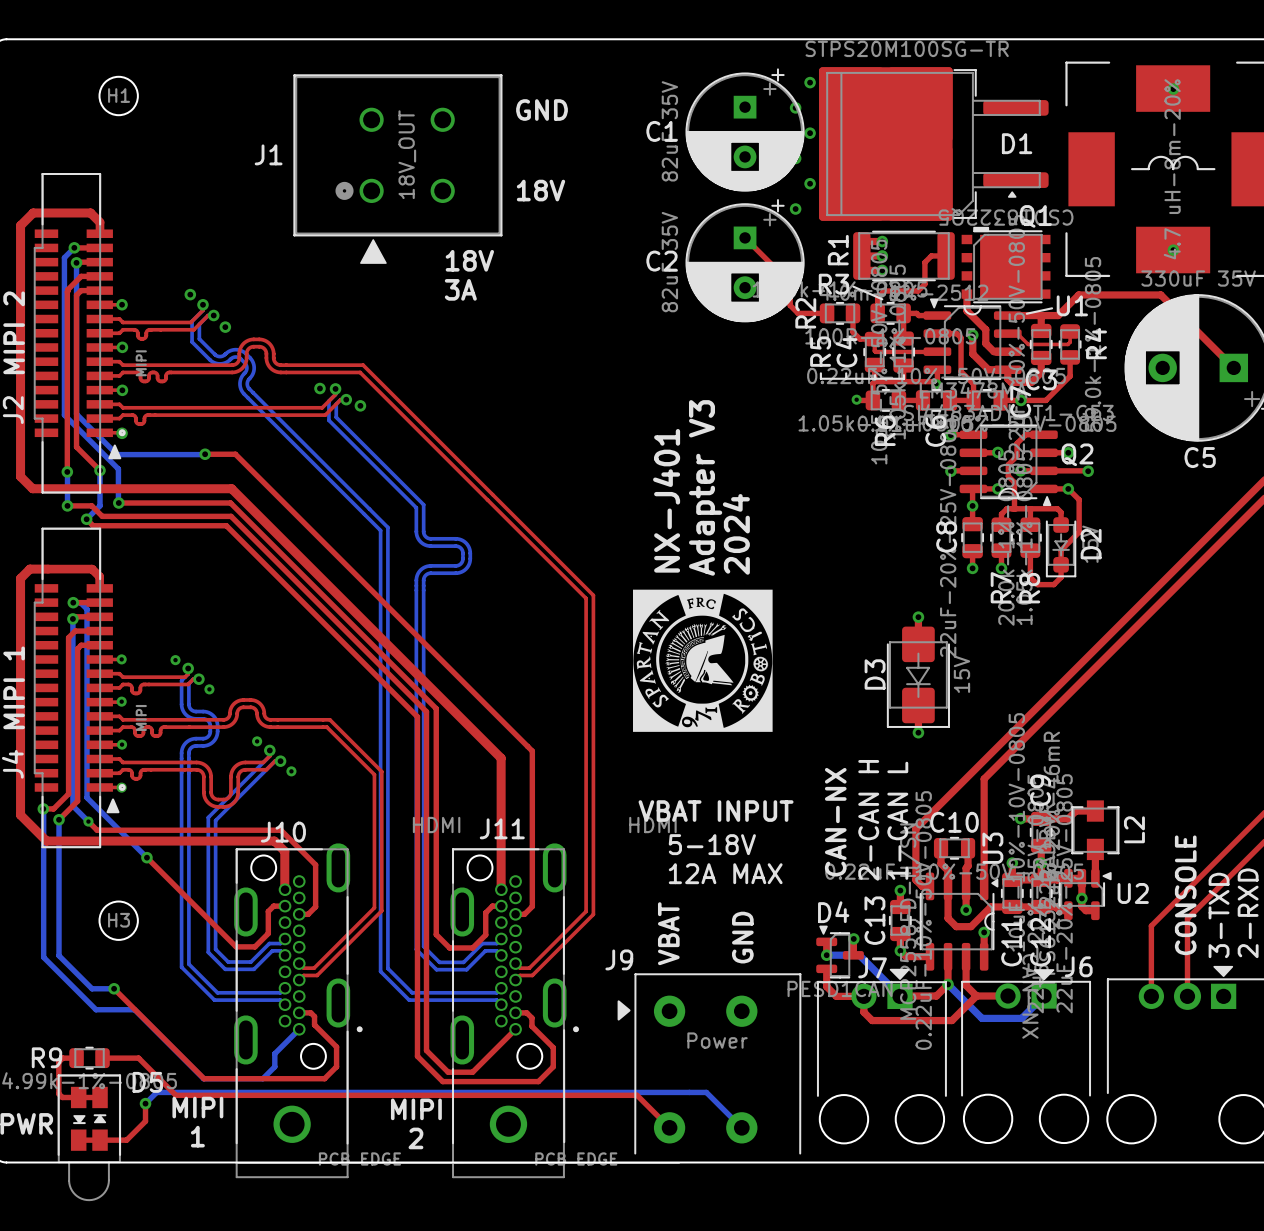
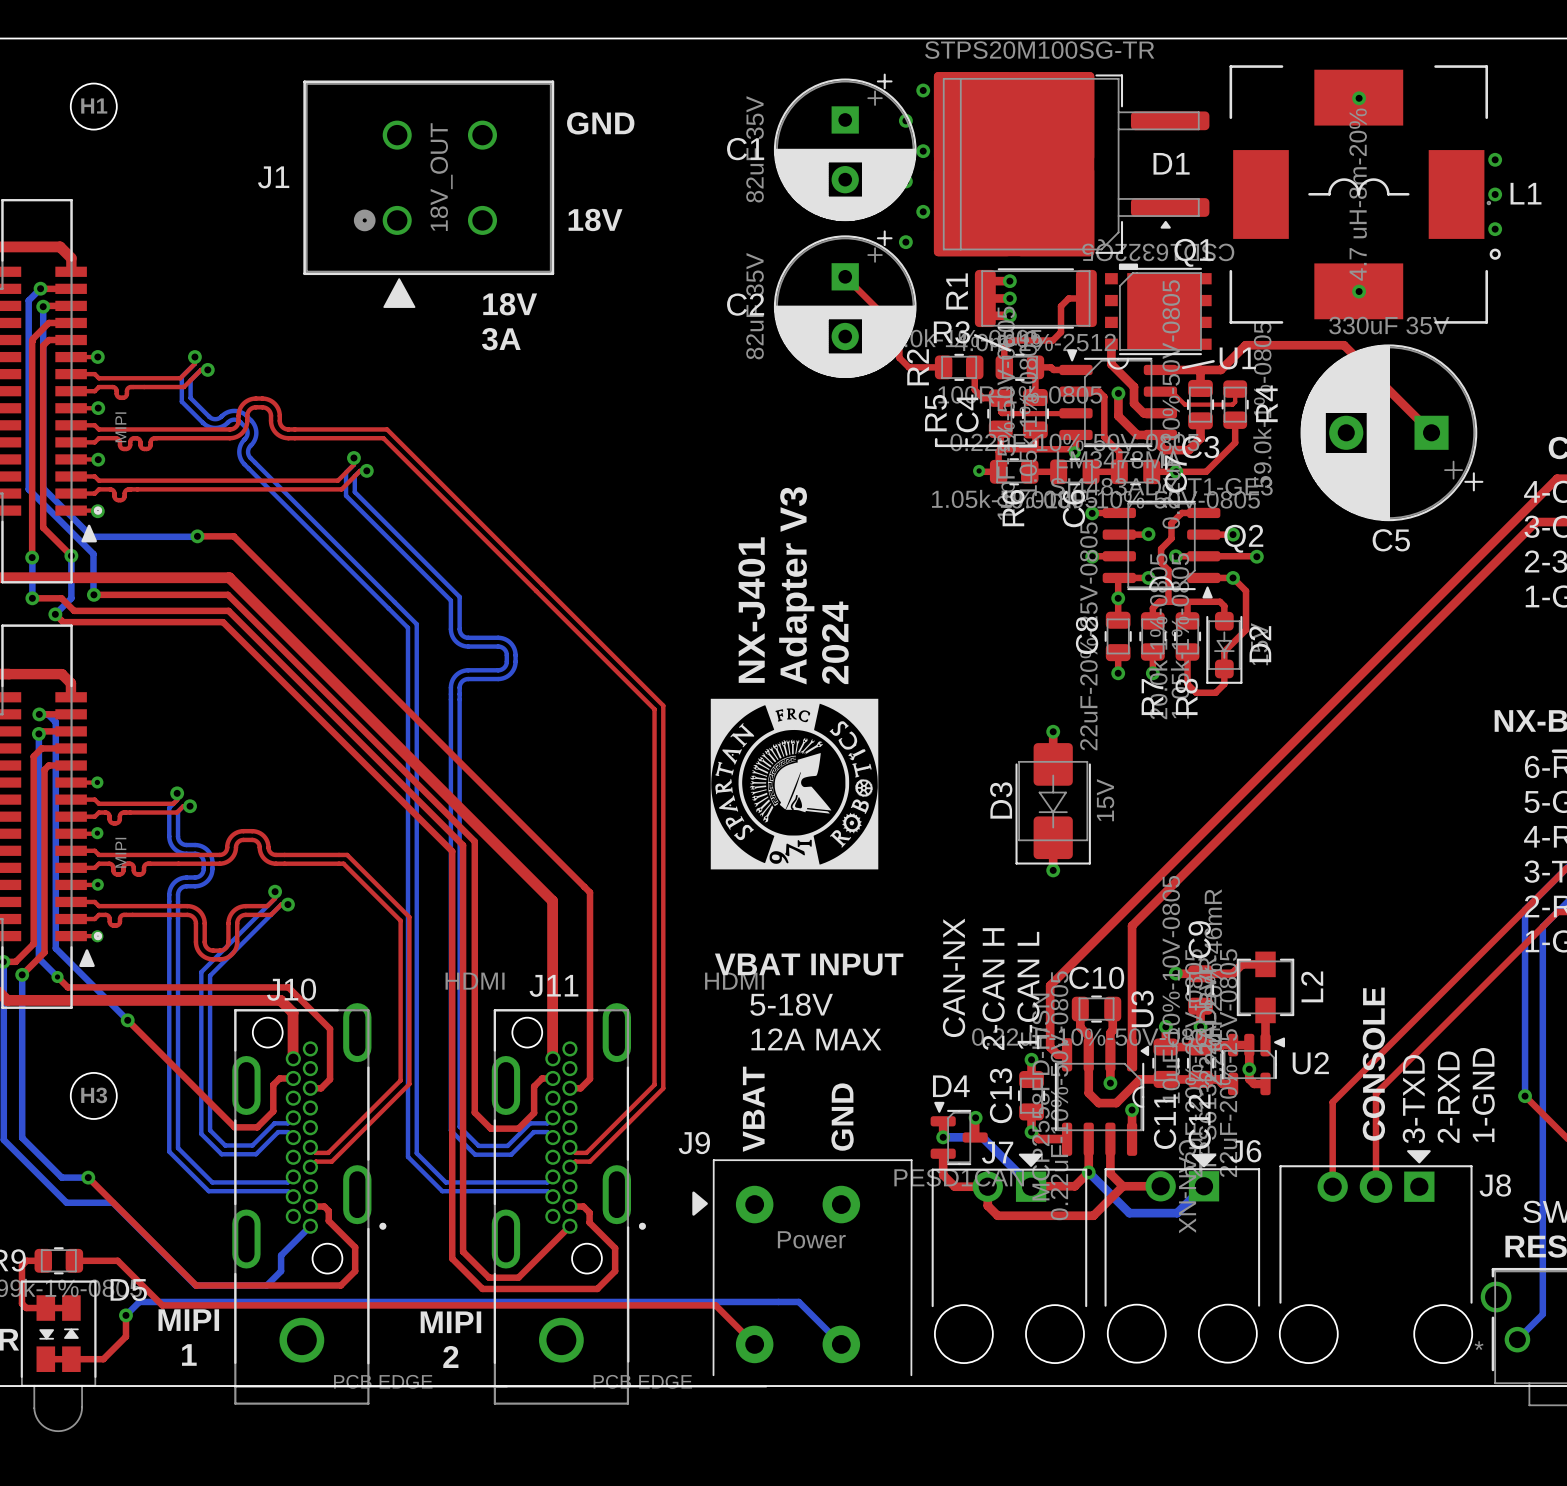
via: (190, 294) -> none
via: (225, 327) -> none
via: (319, 388) -> none
via: (360, 405) -> none
via: (175, 660) -> none
via: (209, 689) -> none
via: (257, 741) -> none
via: (291, 771) -> none

